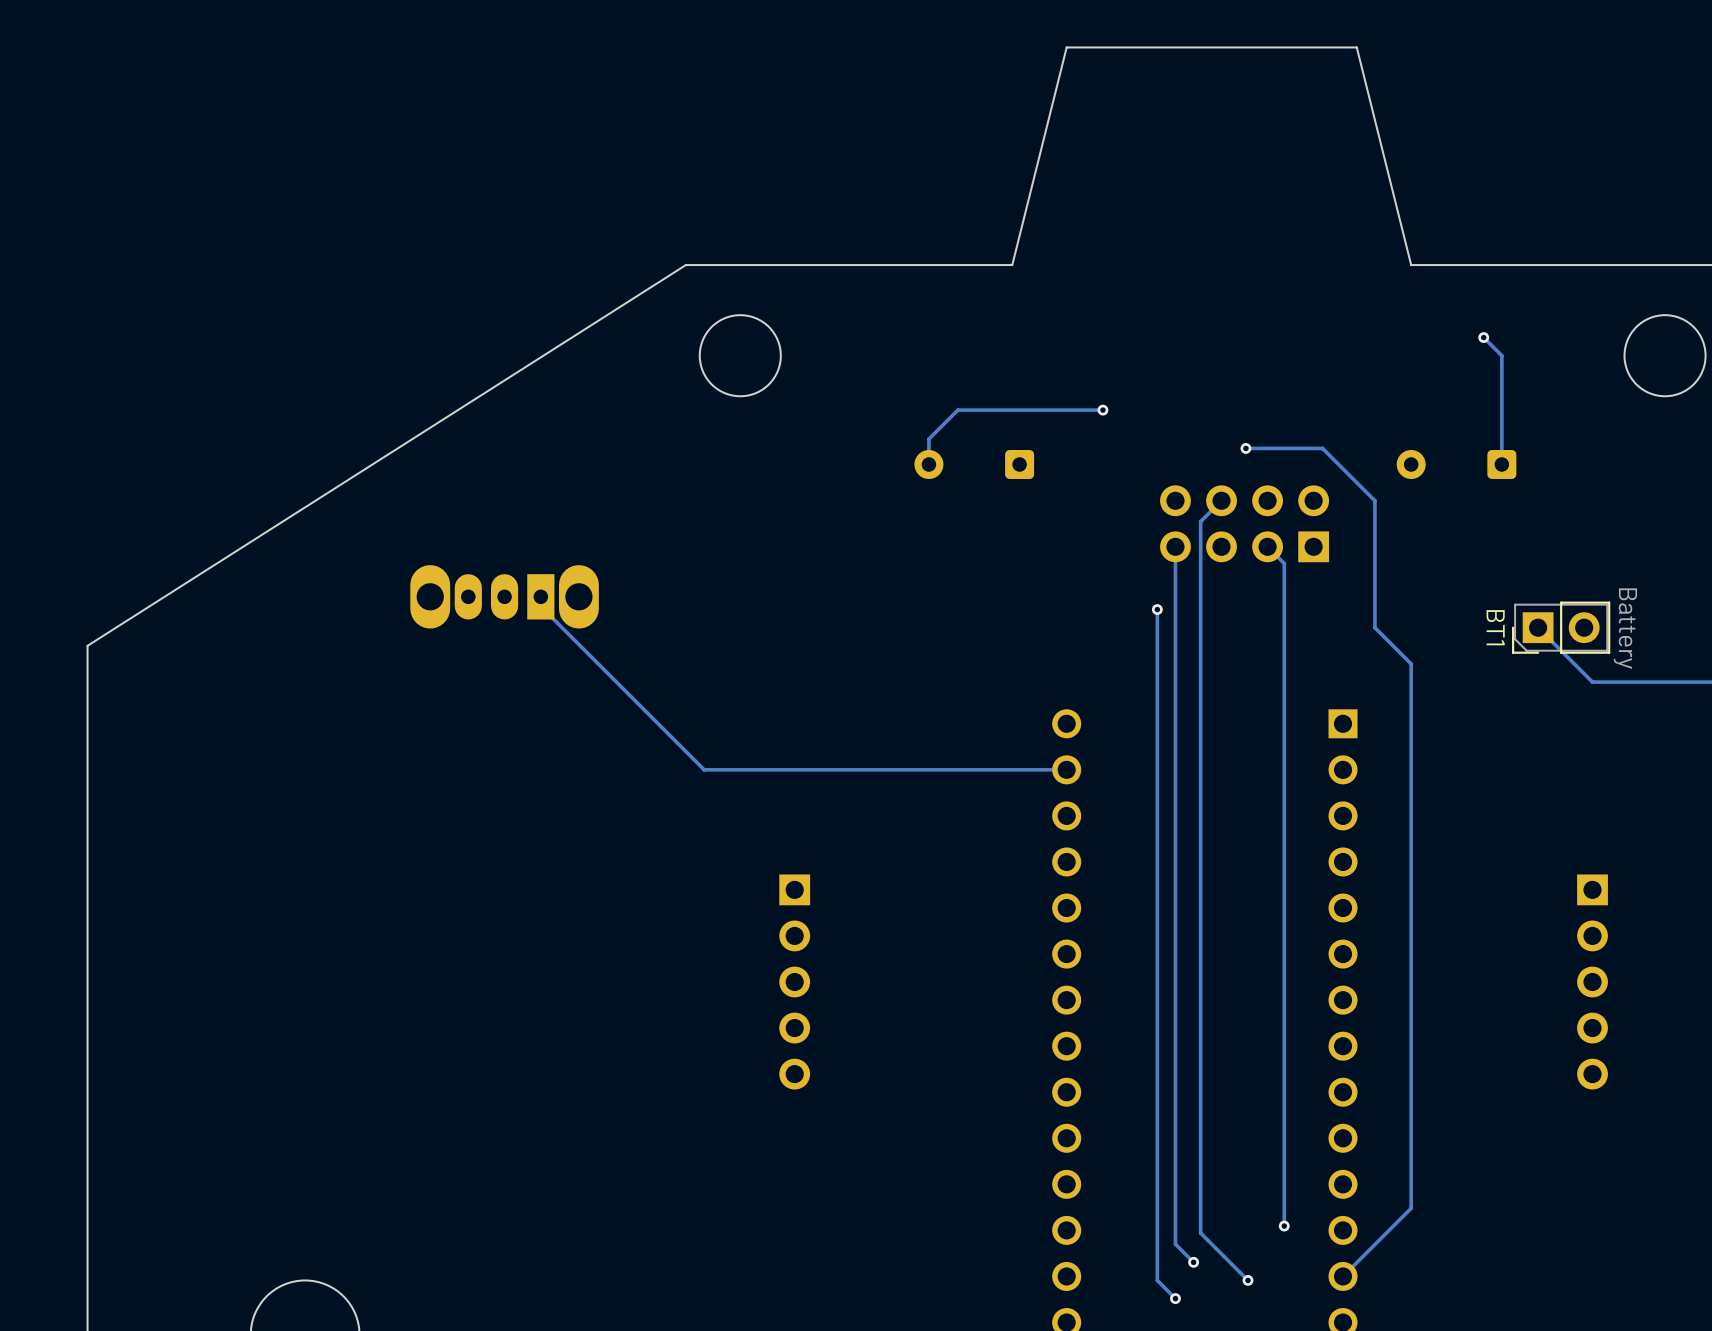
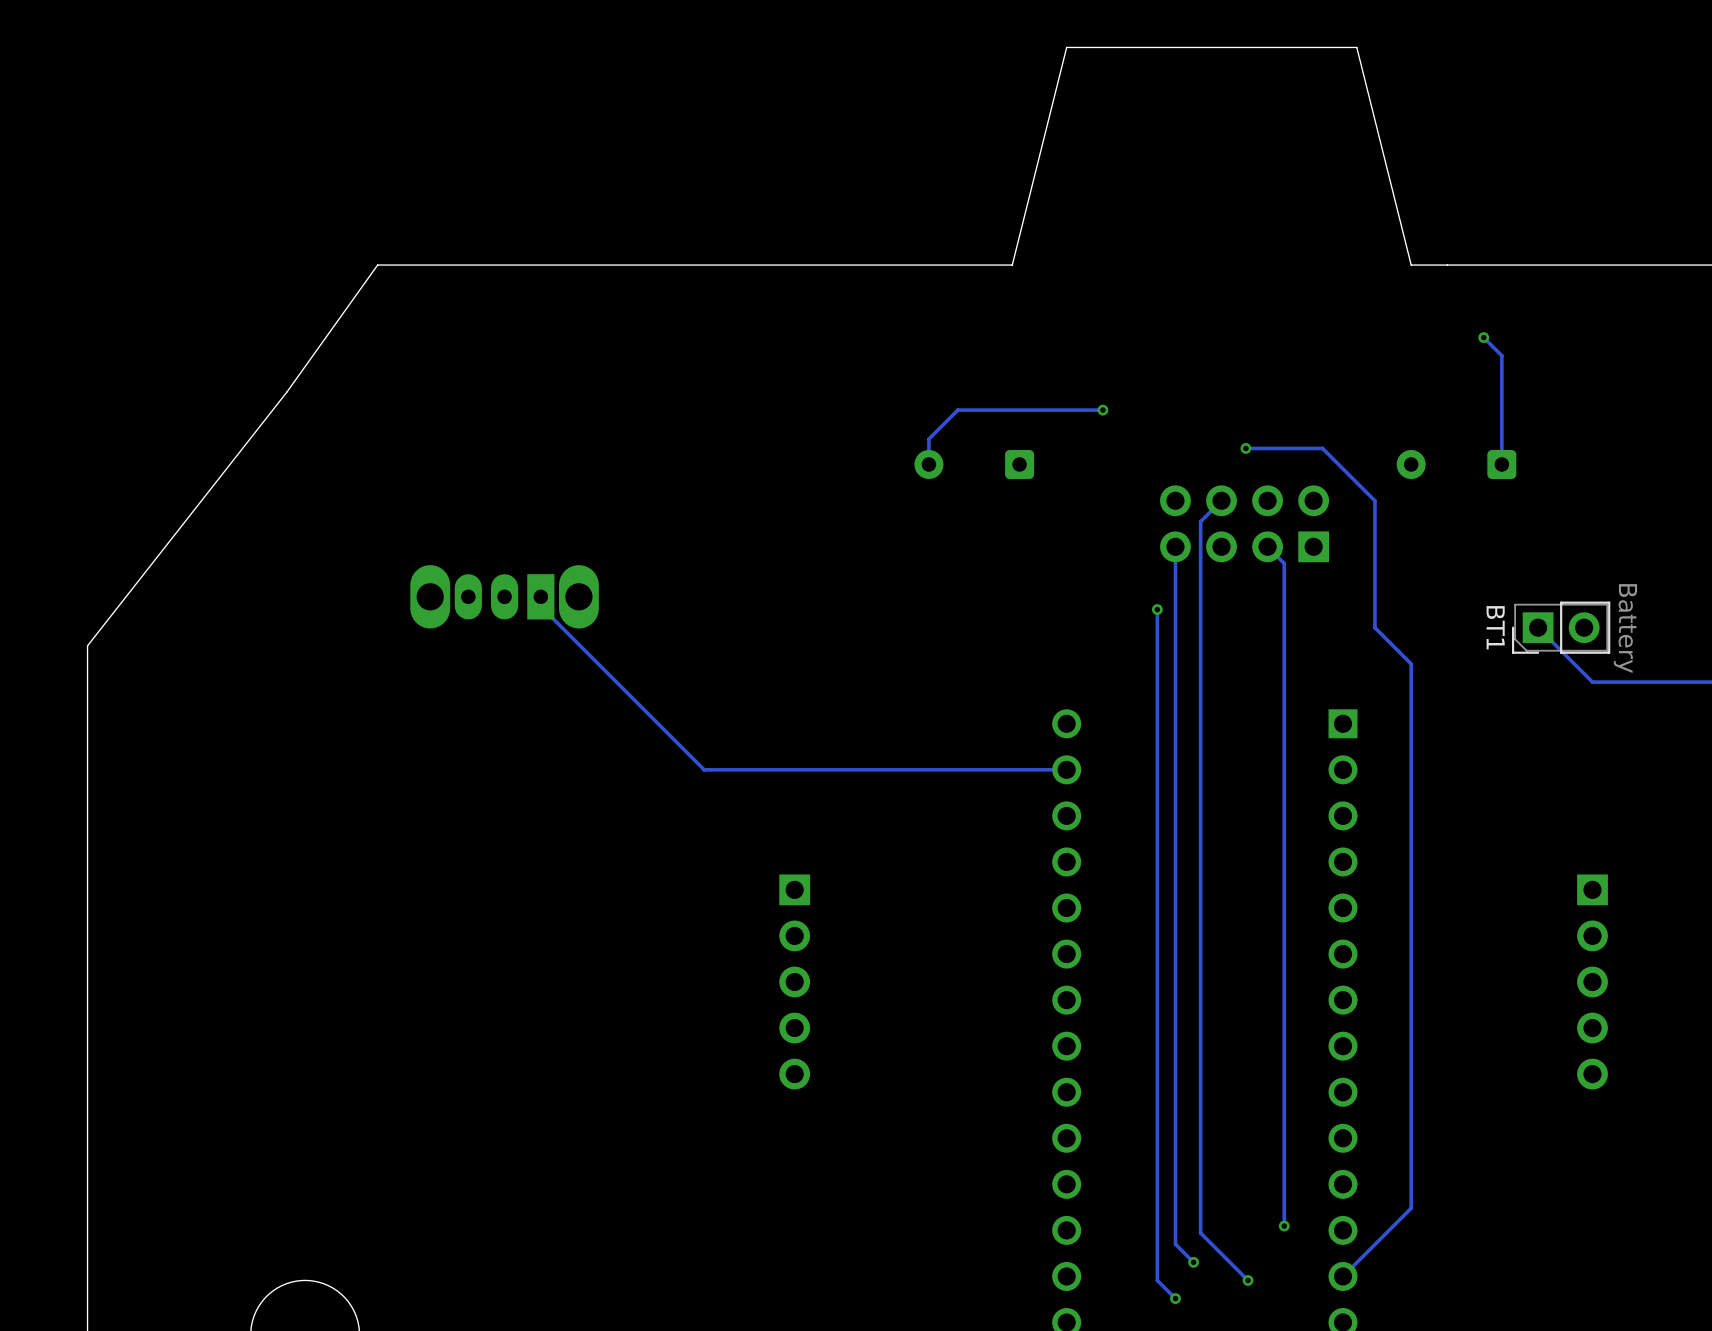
board edge: (685, 265) (87, 645) -> (685, 265) (377, 265) (286, 391) (87, 645)
round board edge: [699, 314, 782, 397] -> none
round board edge: [1624, 314, 1707, 397] -> none

